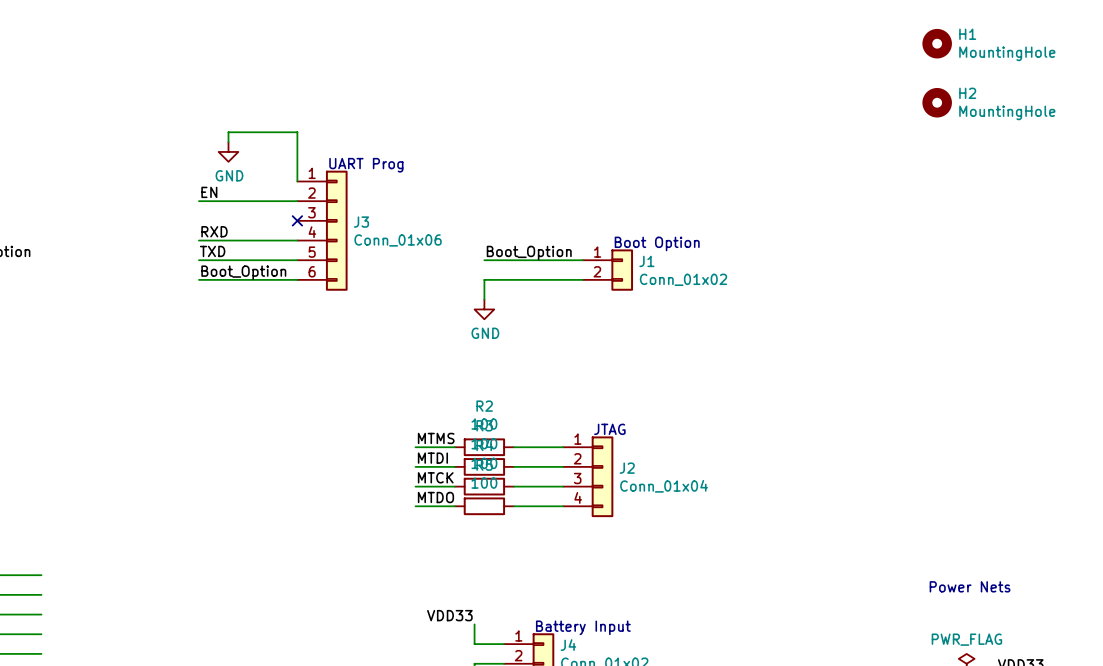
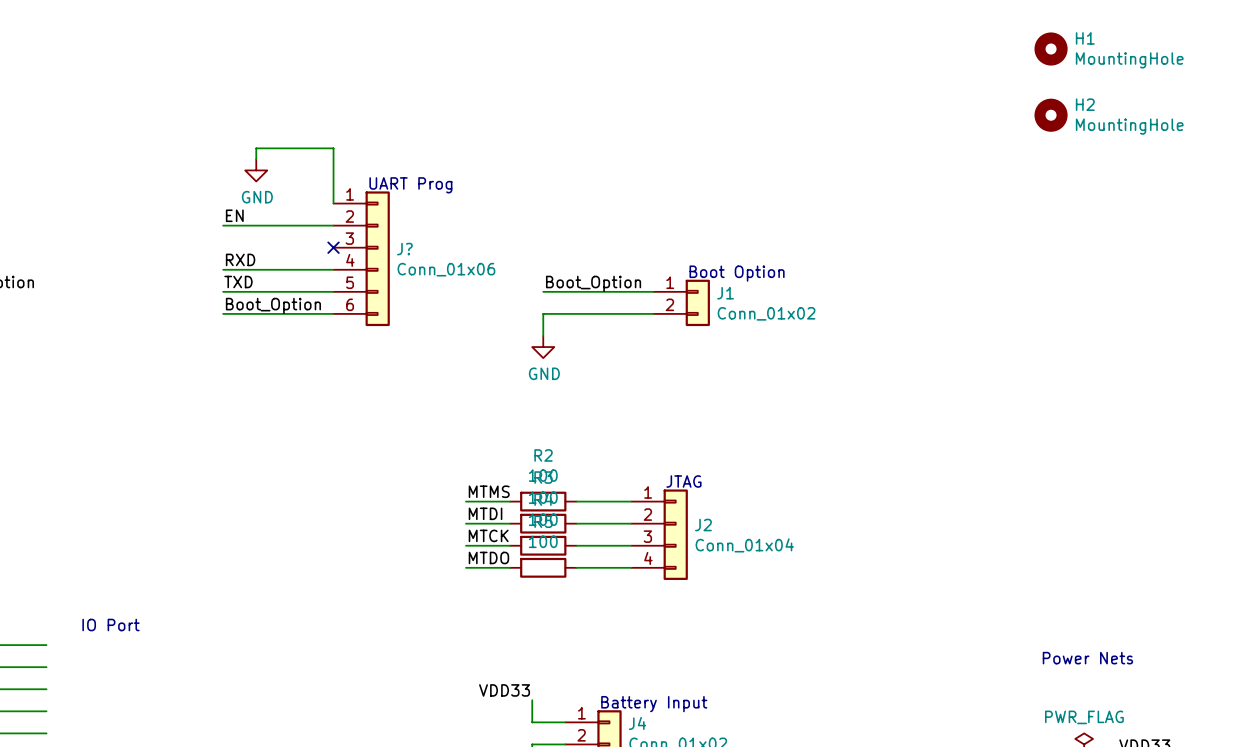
J3 name: J3 (361, 222) -> J? (404, 249)
text: none -> IO Port (111, 625)

